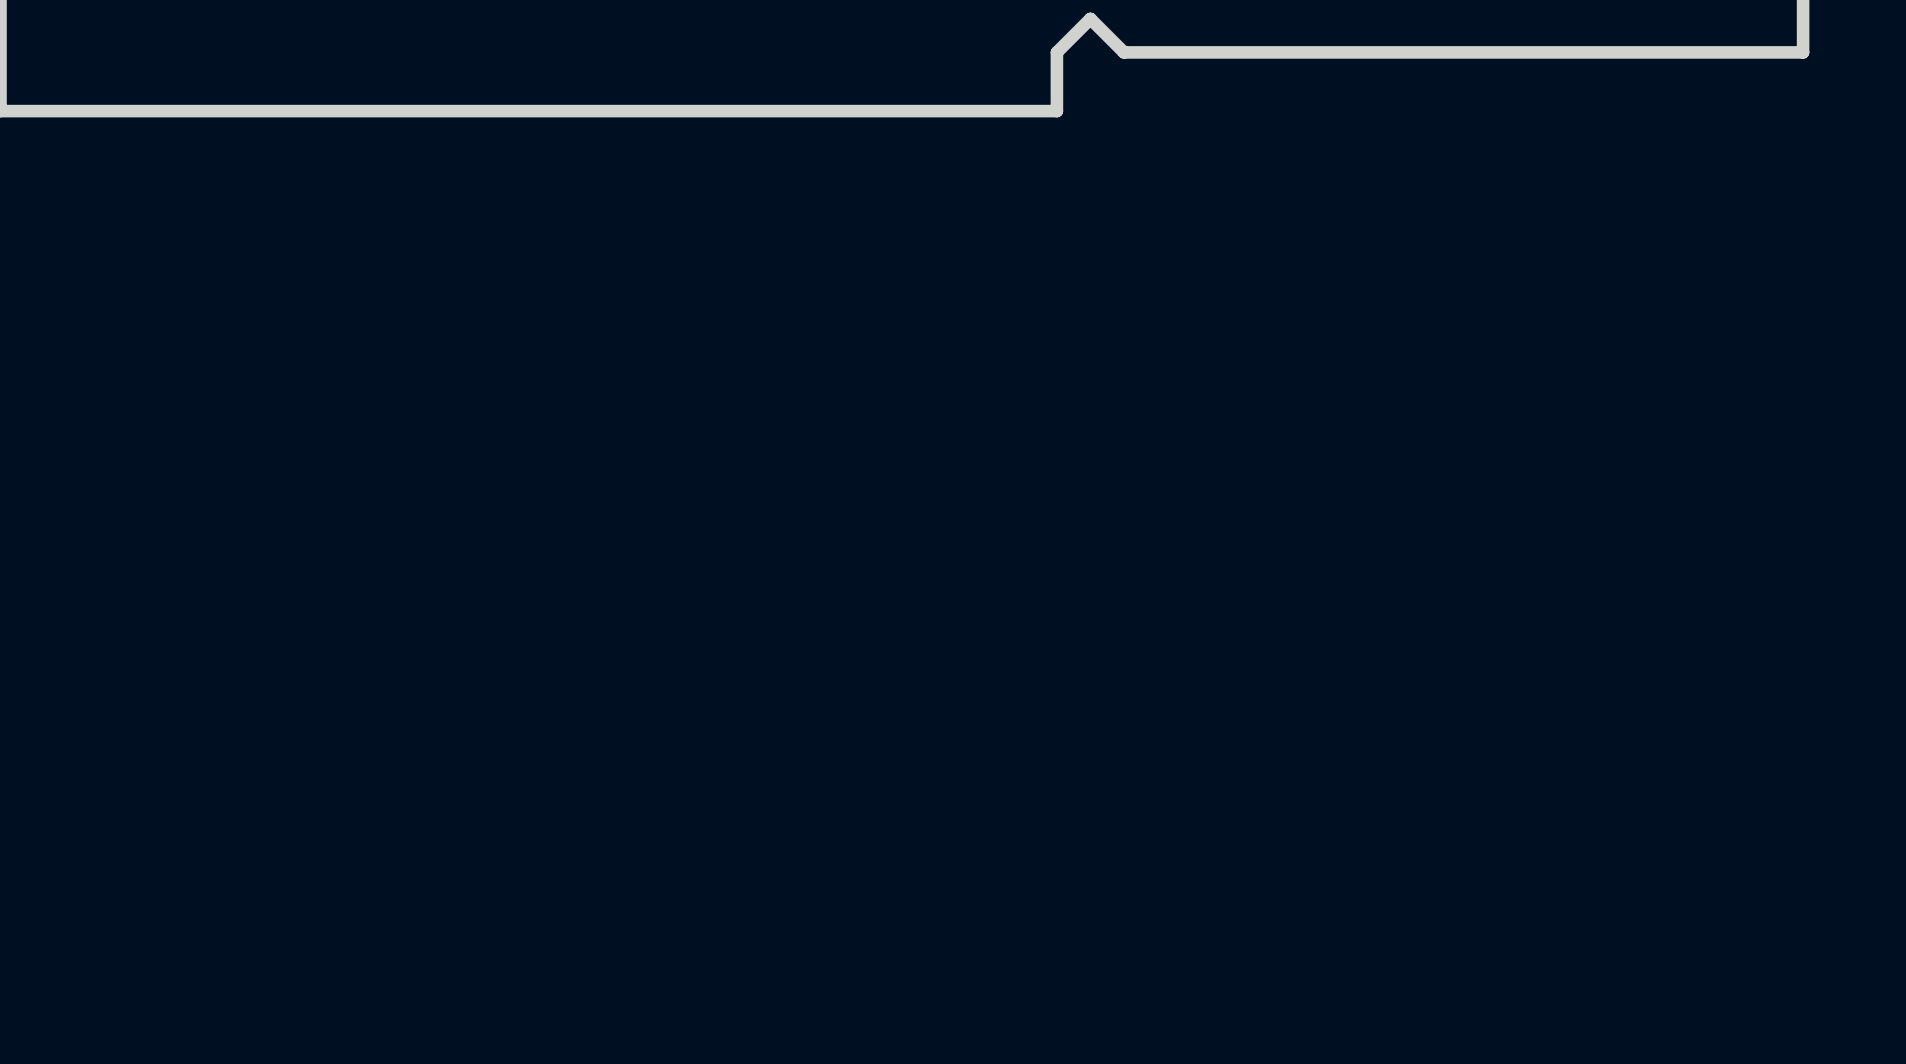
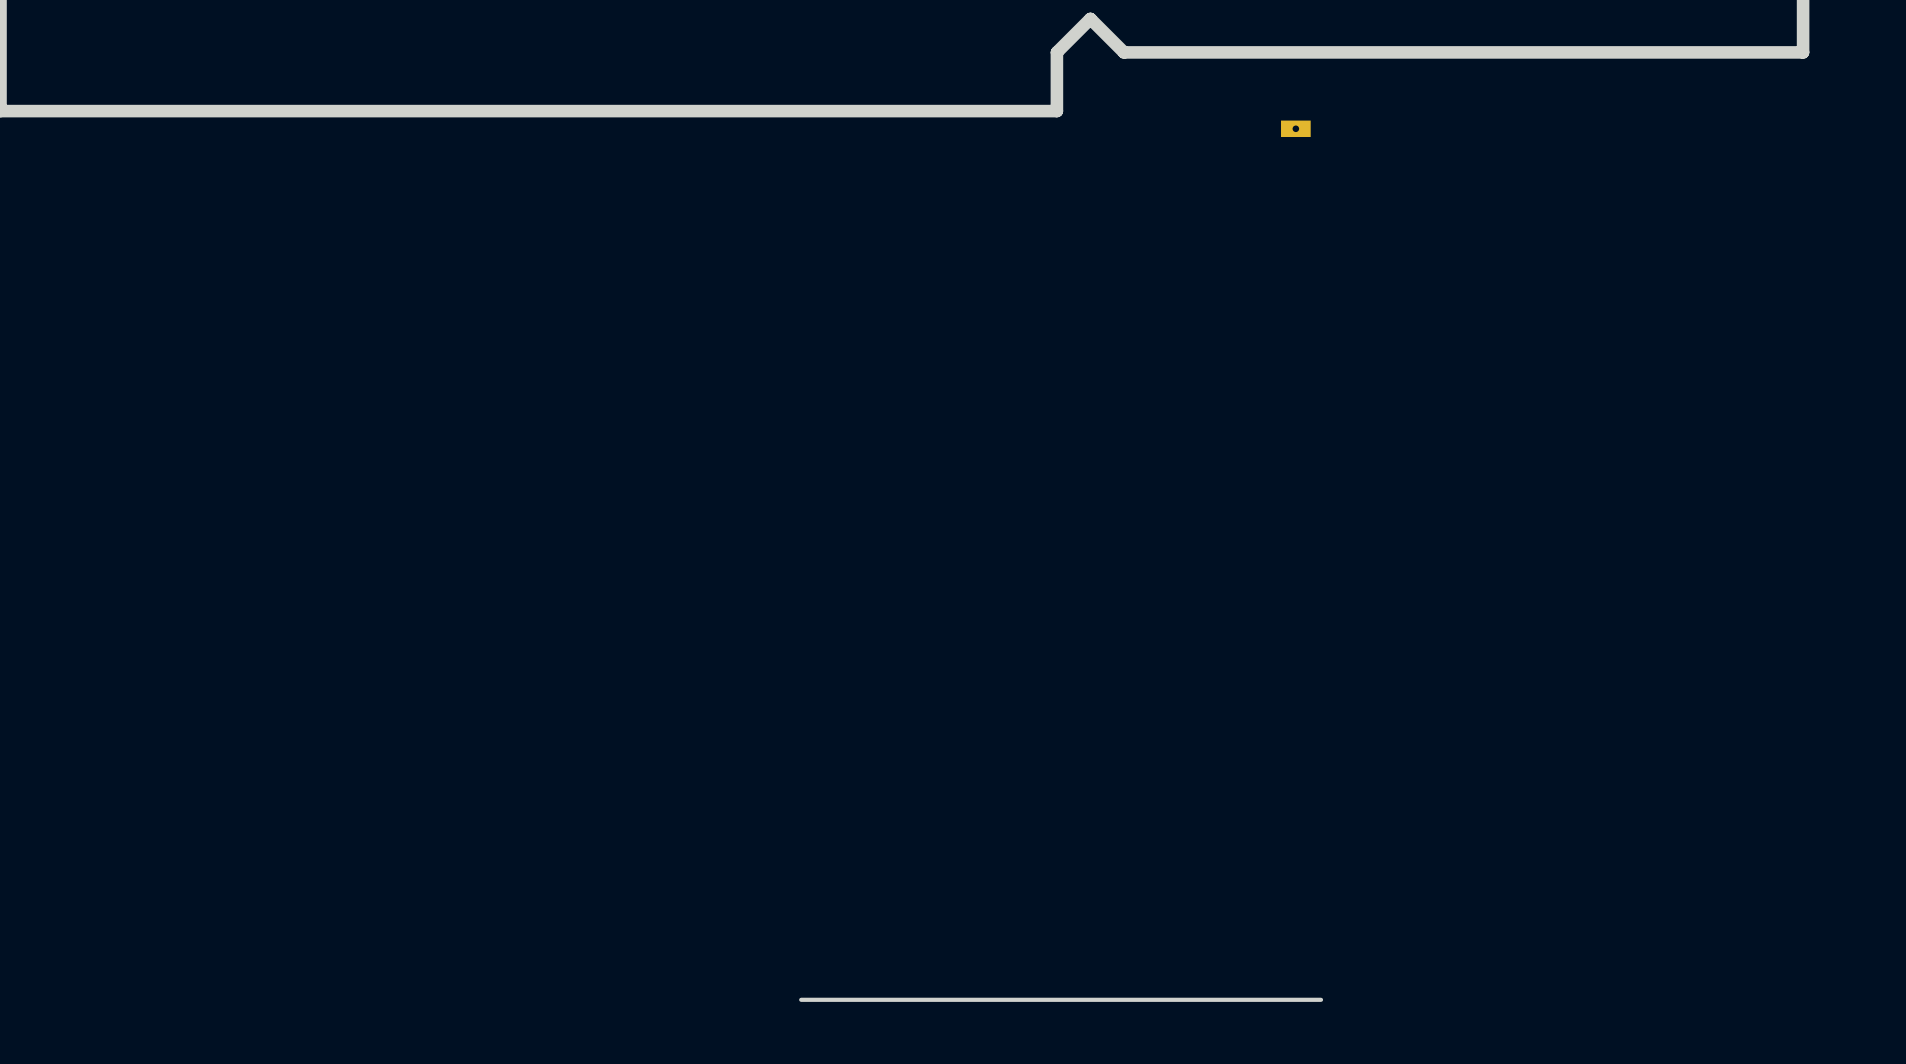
part: none -> (1295, 128)
board edge: none -> (1321, 999) (801, 999)

